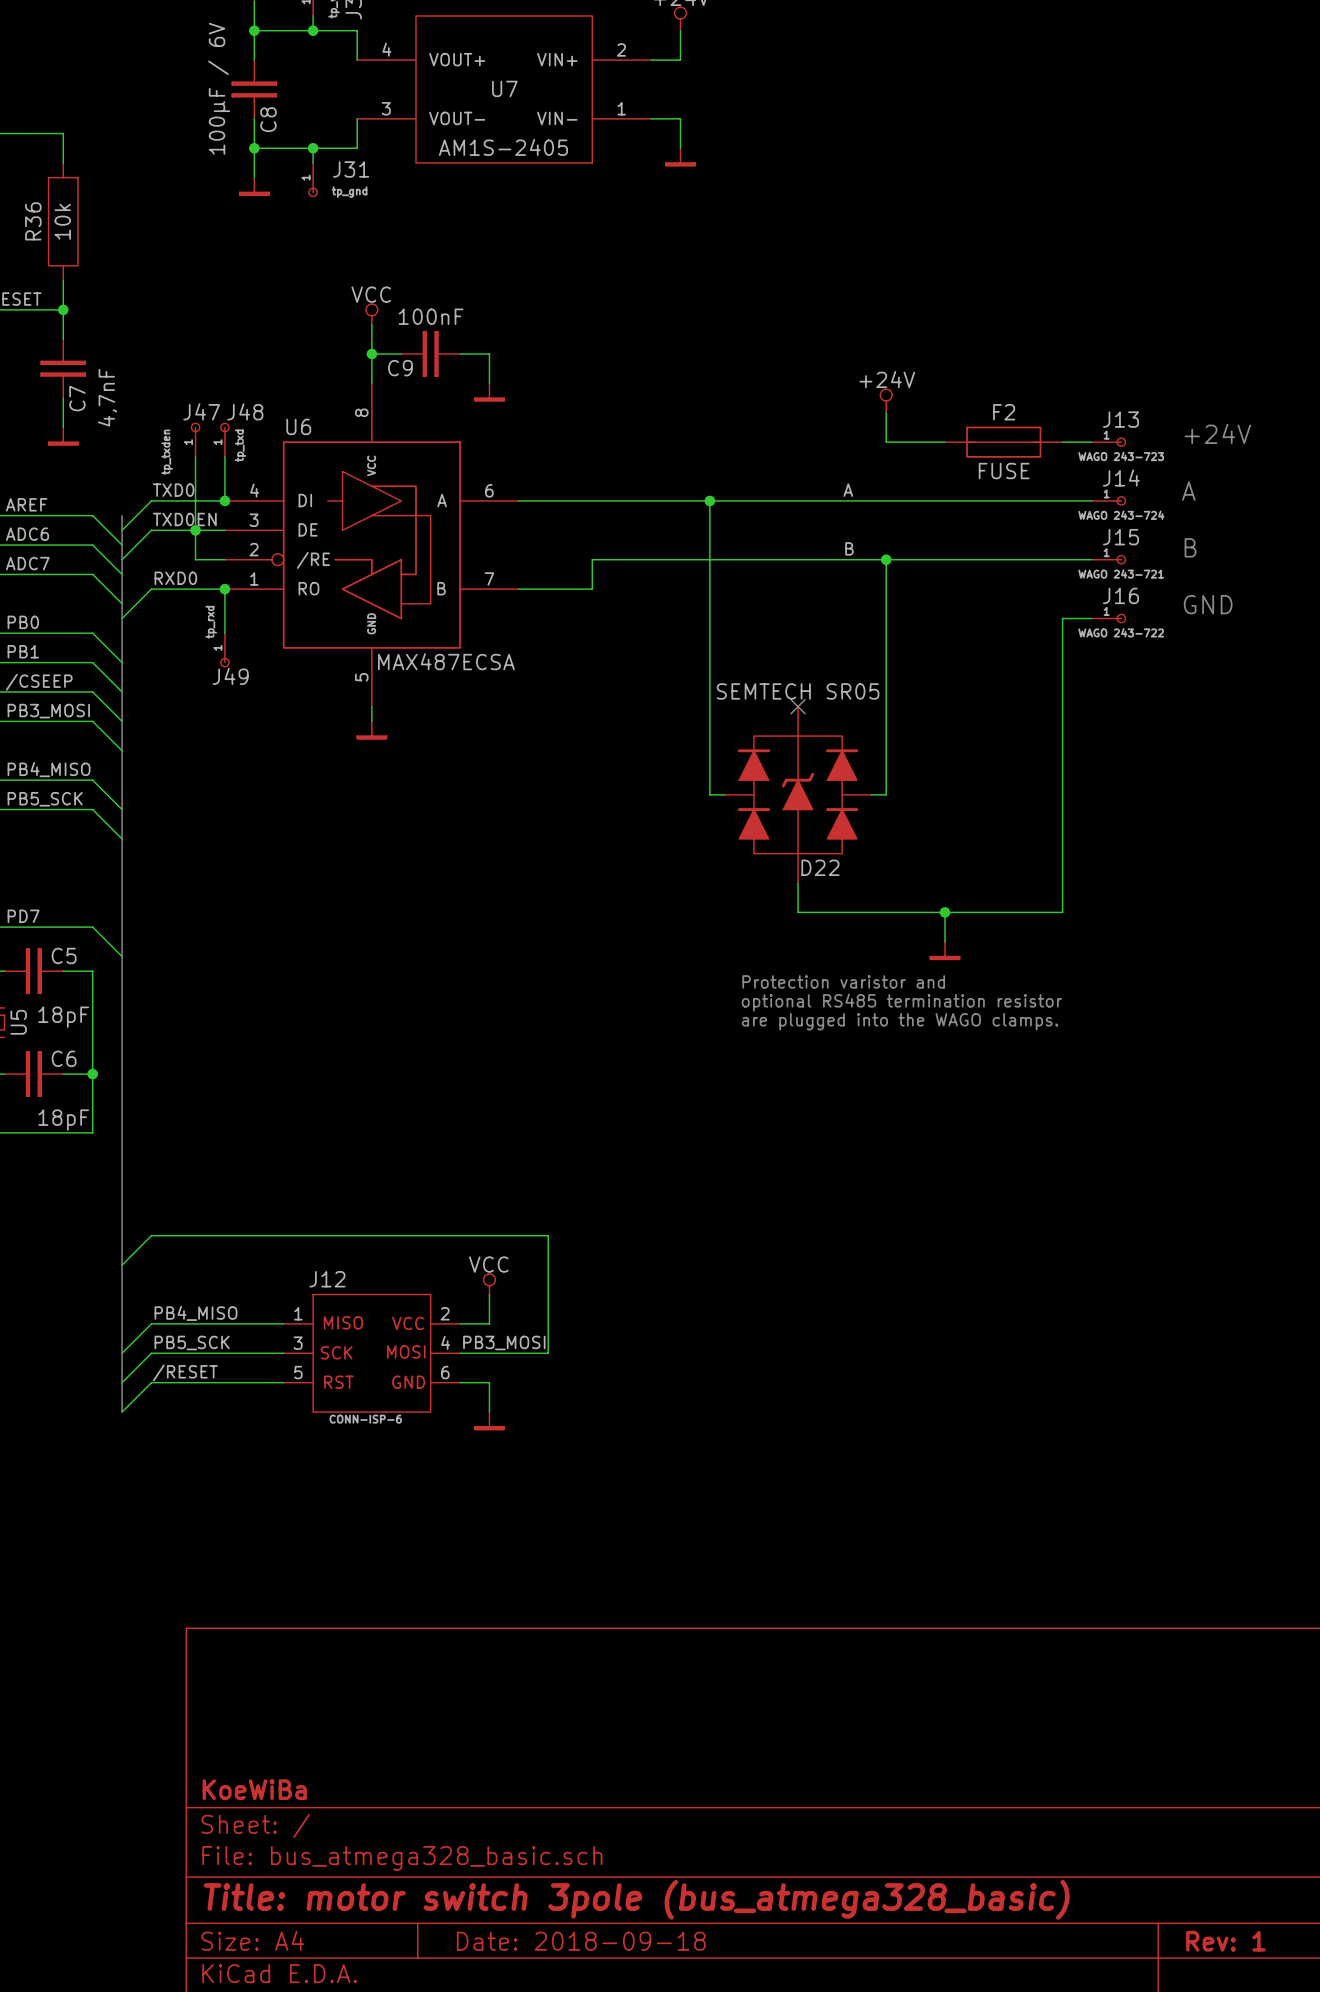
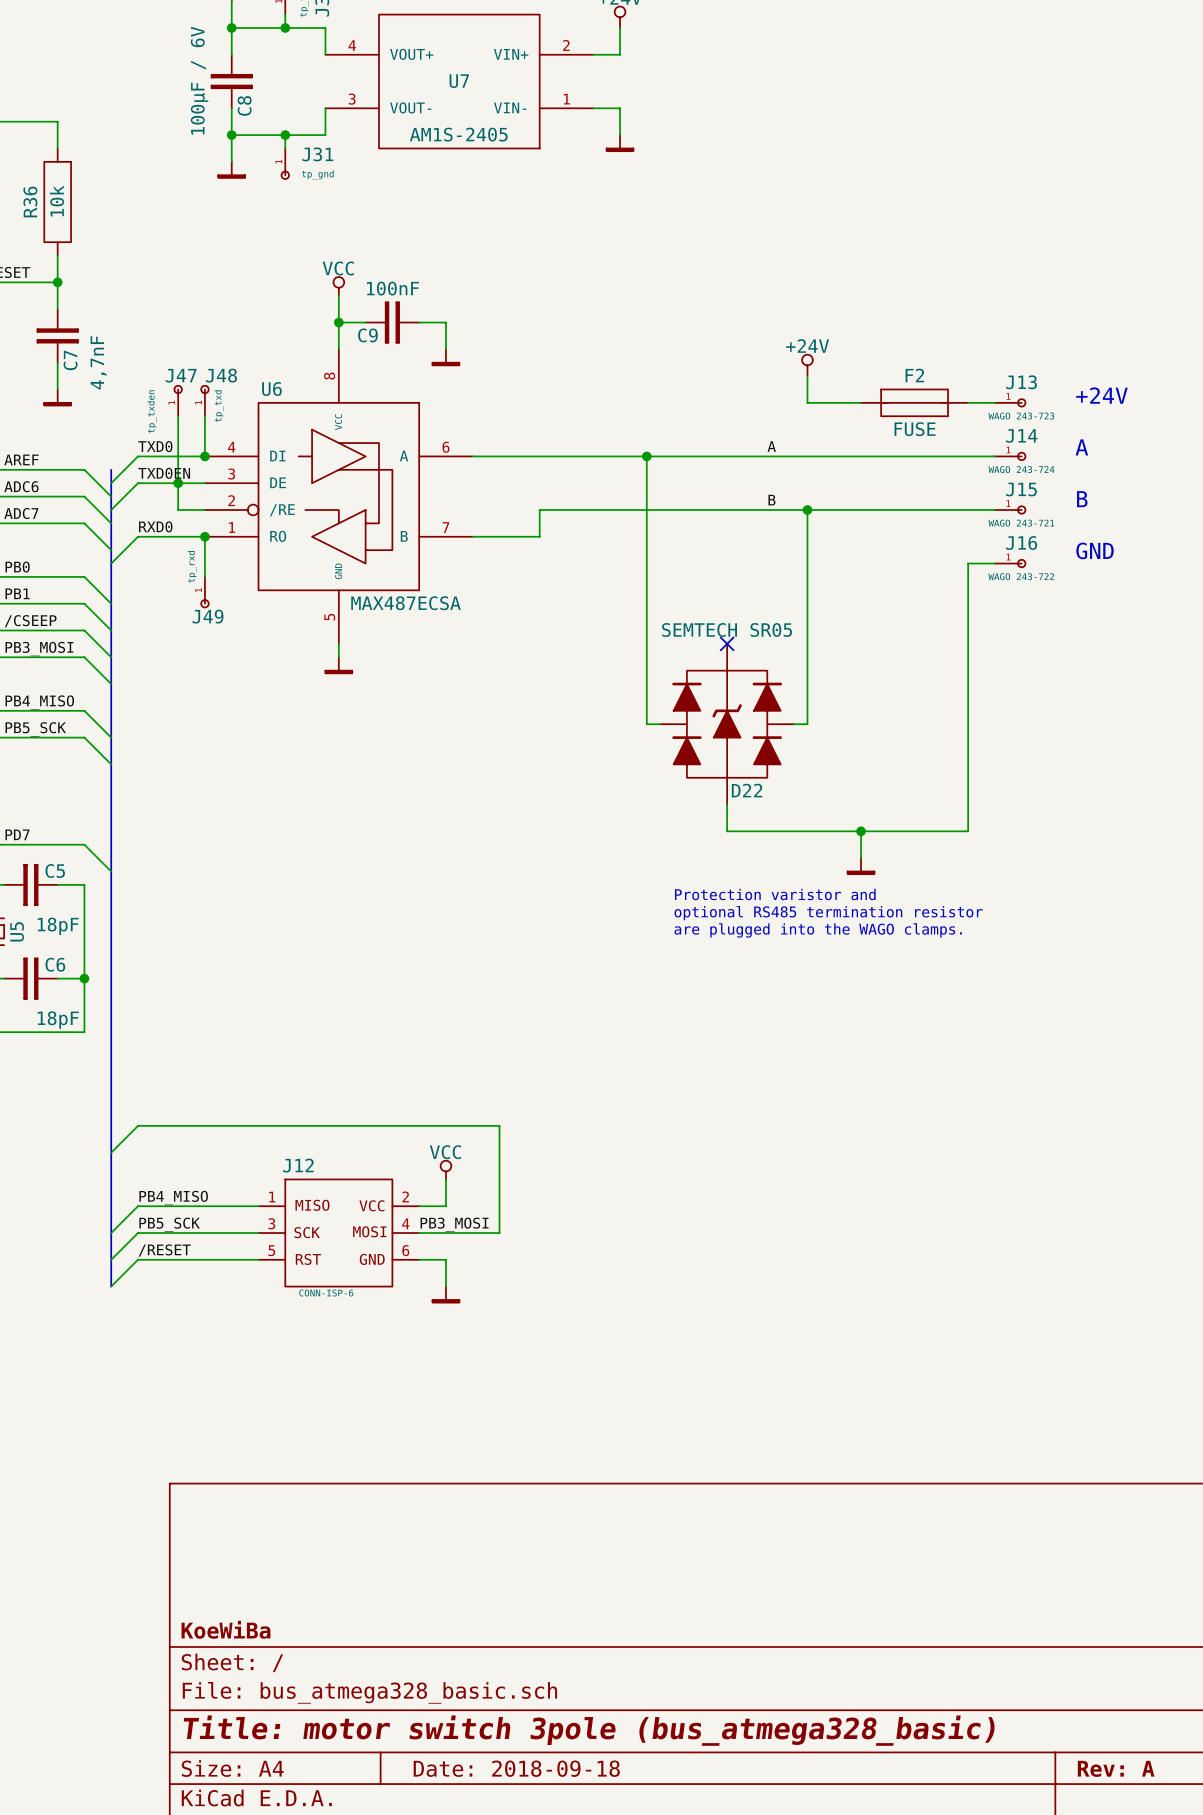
title block: Rev: 1 (1225, 1941) -> Rev: A (1116, 1768)

